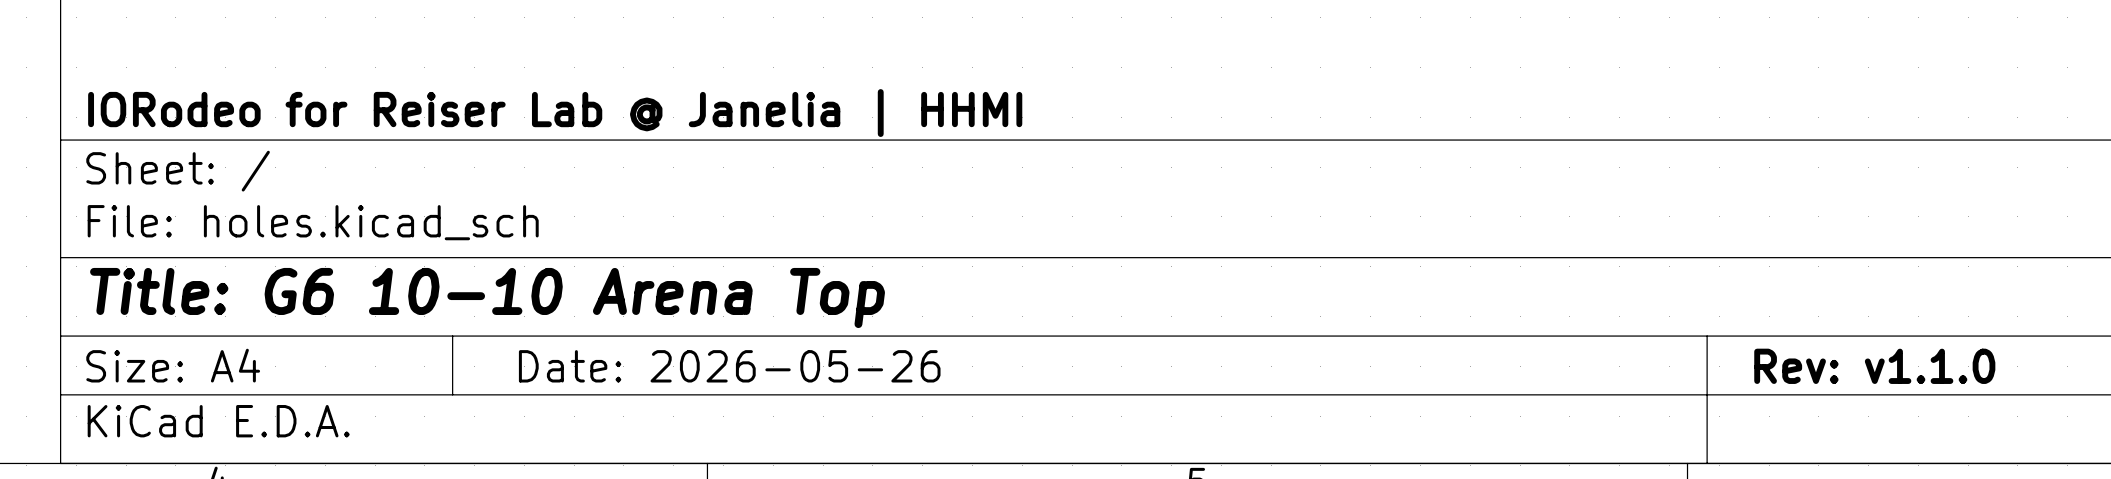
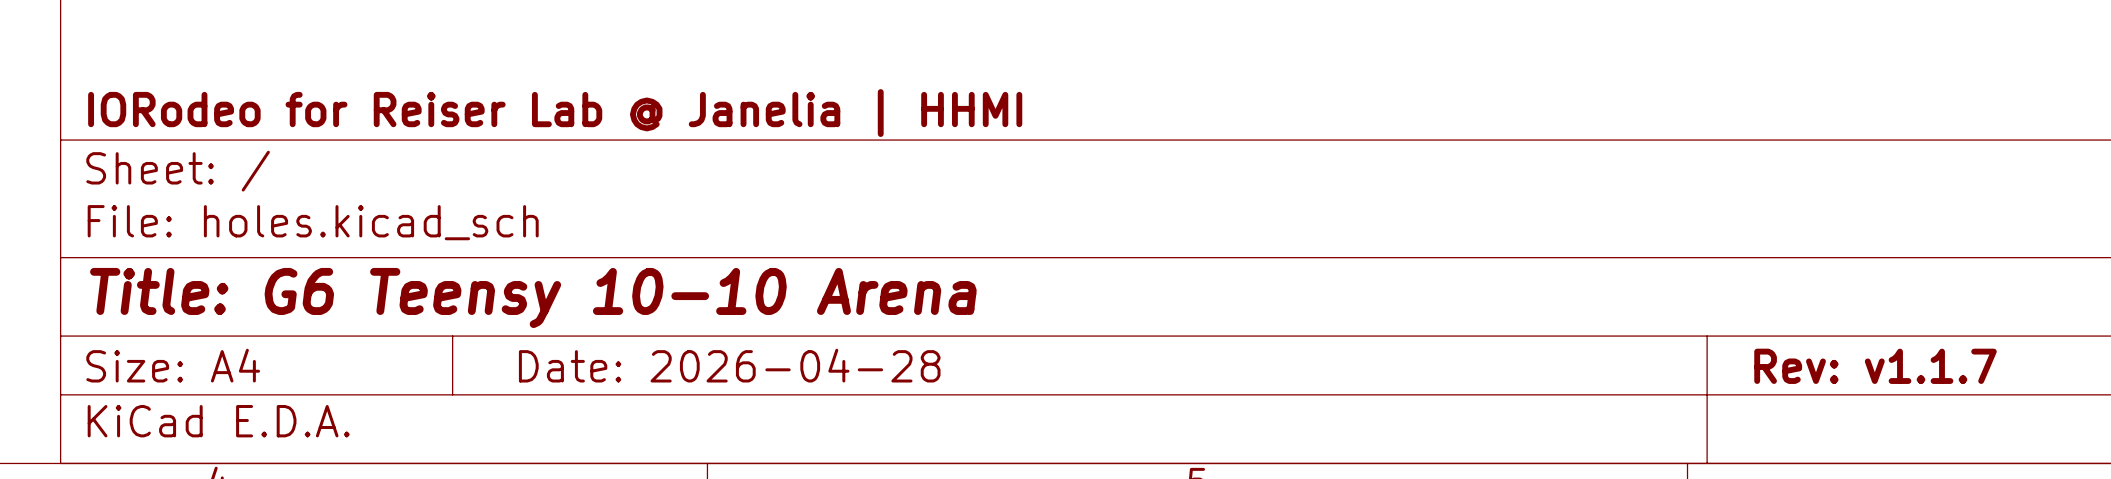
title block: Title: G6 10-10 Arena Top (487, 297) -> Title: G6 Teensy 10-10 Arena (533, 297)
title block: Date: 2026-05-26 (729, 366) -> Date: 2026-04-28 (729, 365)
title block: Rev: v1.1.0 (1874, 366) -> Rev: v1.1.7 (1875, 366)

